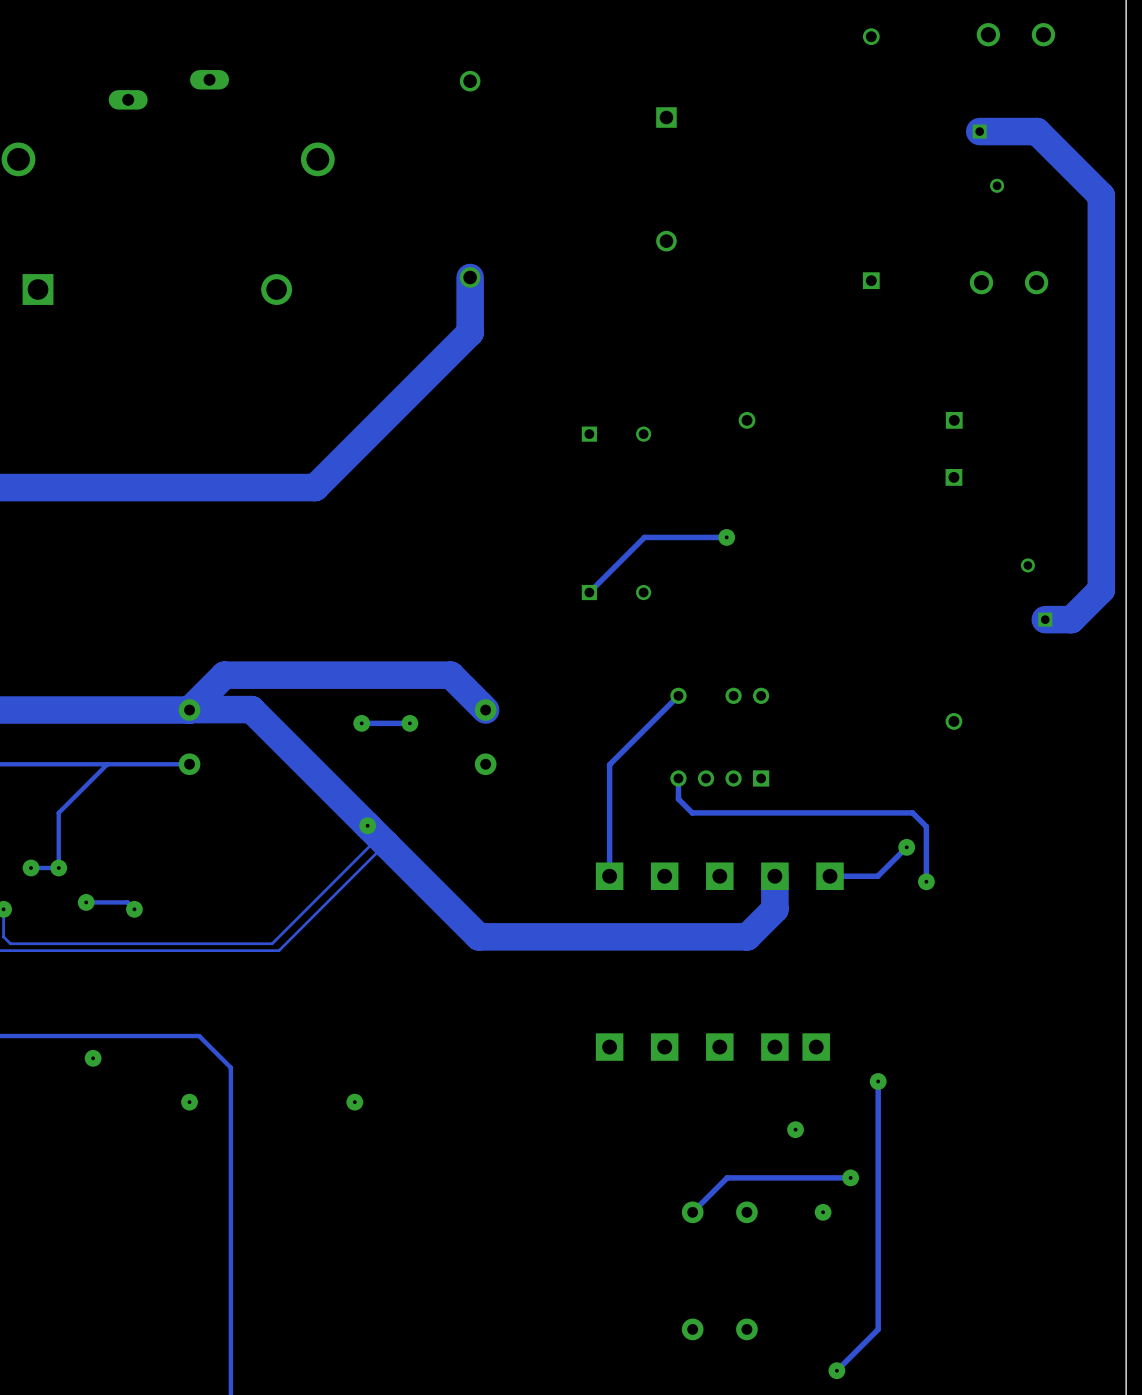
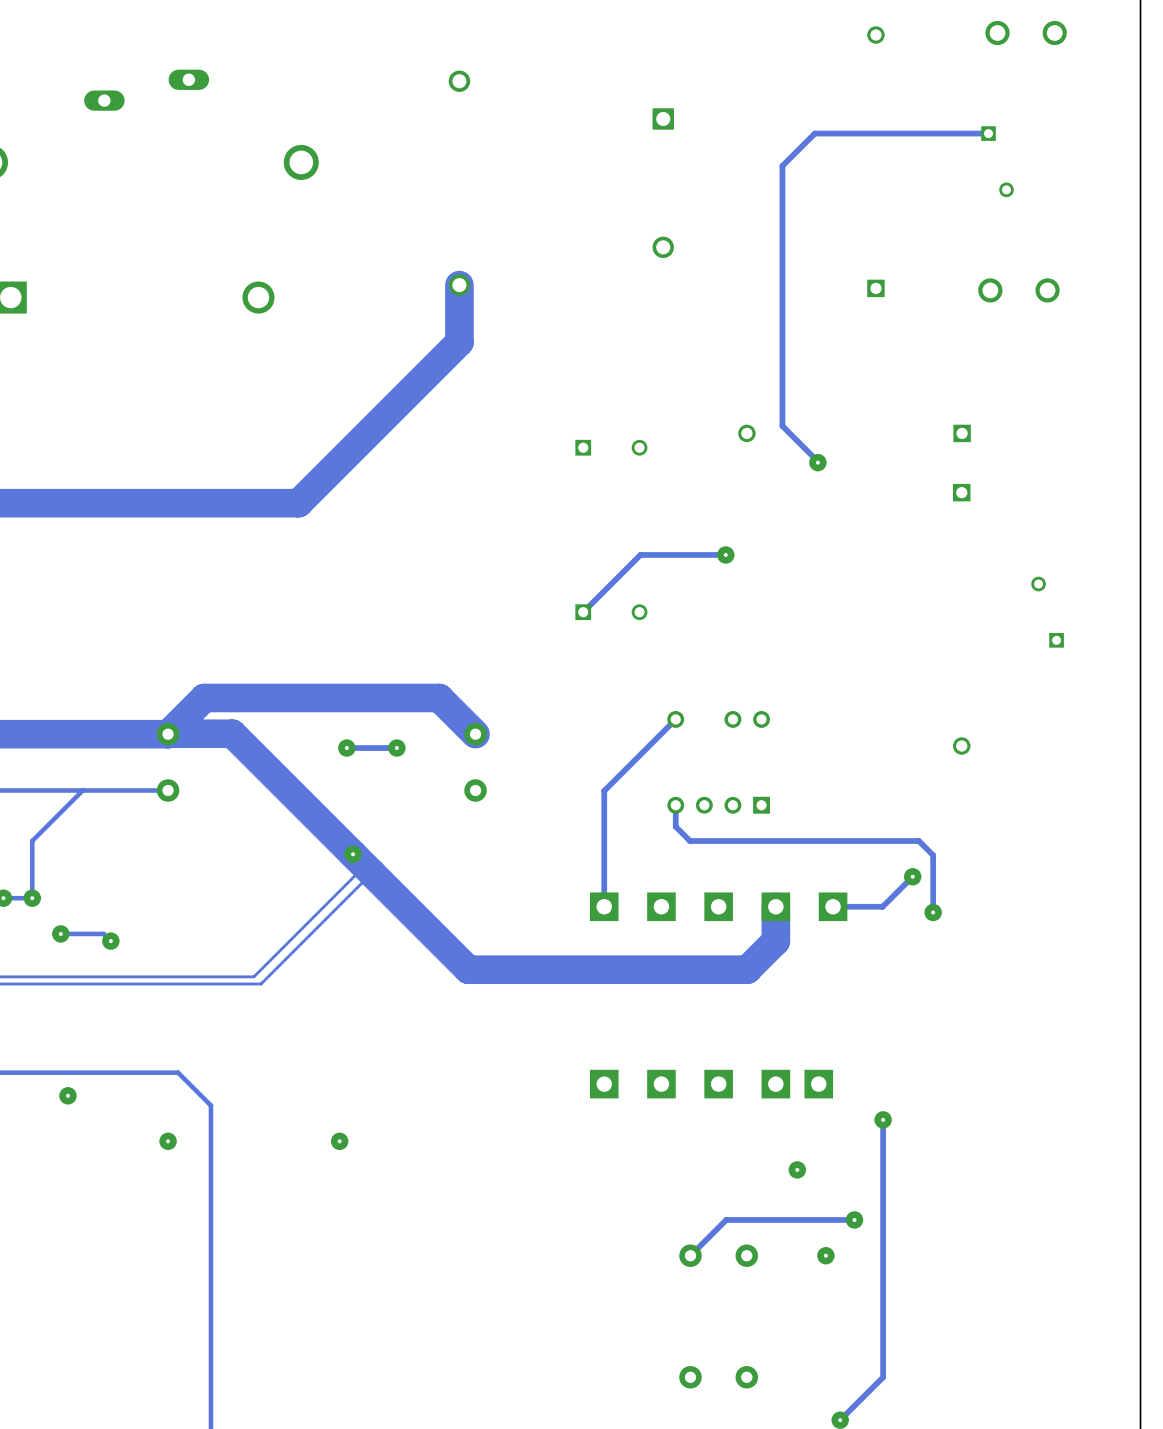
track: (979, 131) (1037, 131) (1101, 195) (1101, 589) (1071, 619) (1045, 619) -> (988, 133) (814, 133) (782, 165) (782, 426) (817, 462)
via: none -> (817, 462)

